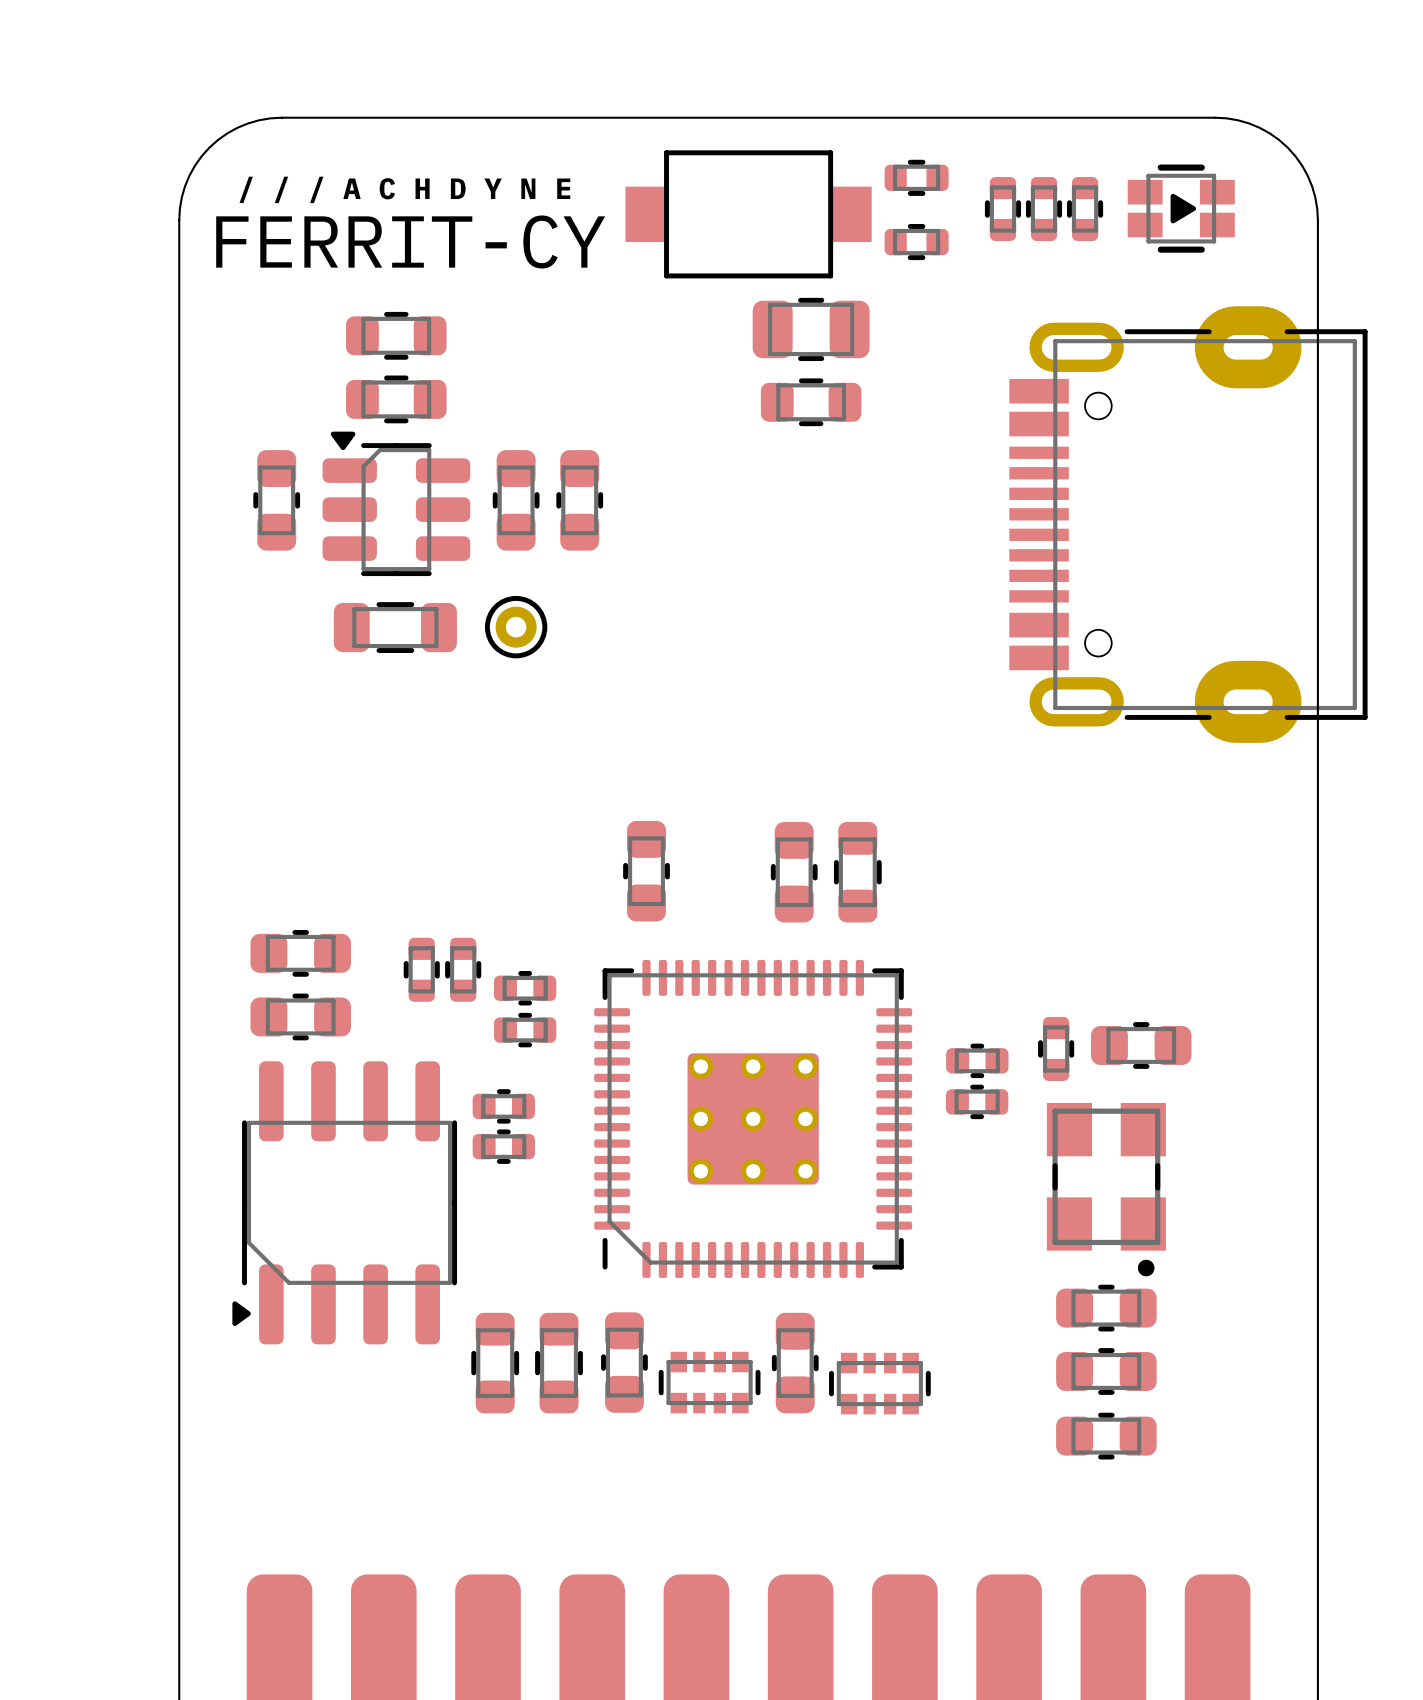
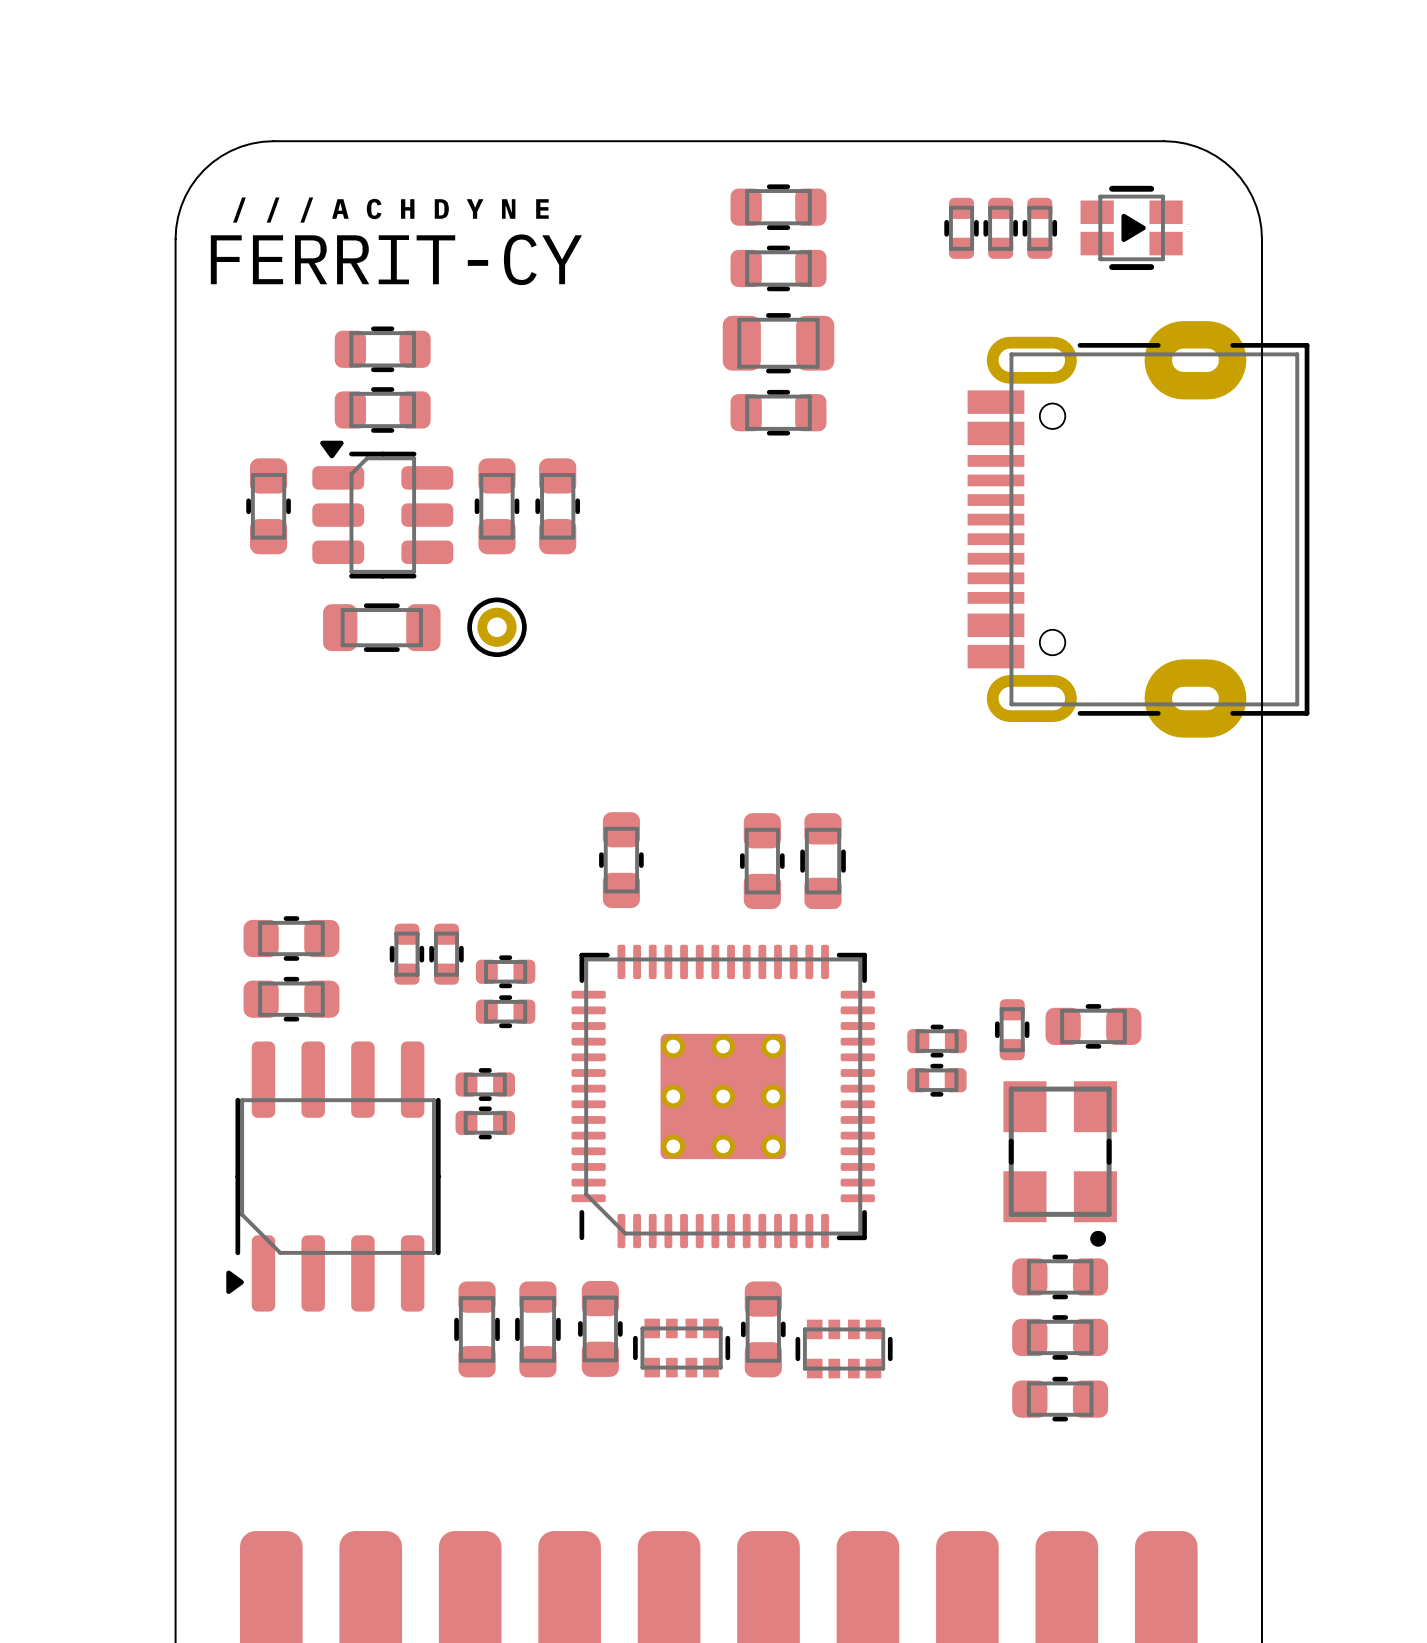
part: (916, 177) -> none
part: none -> (778, 207)
part: (748, 214) -> none
part: (916, 242) -> none
part: none -> (778, 268)

